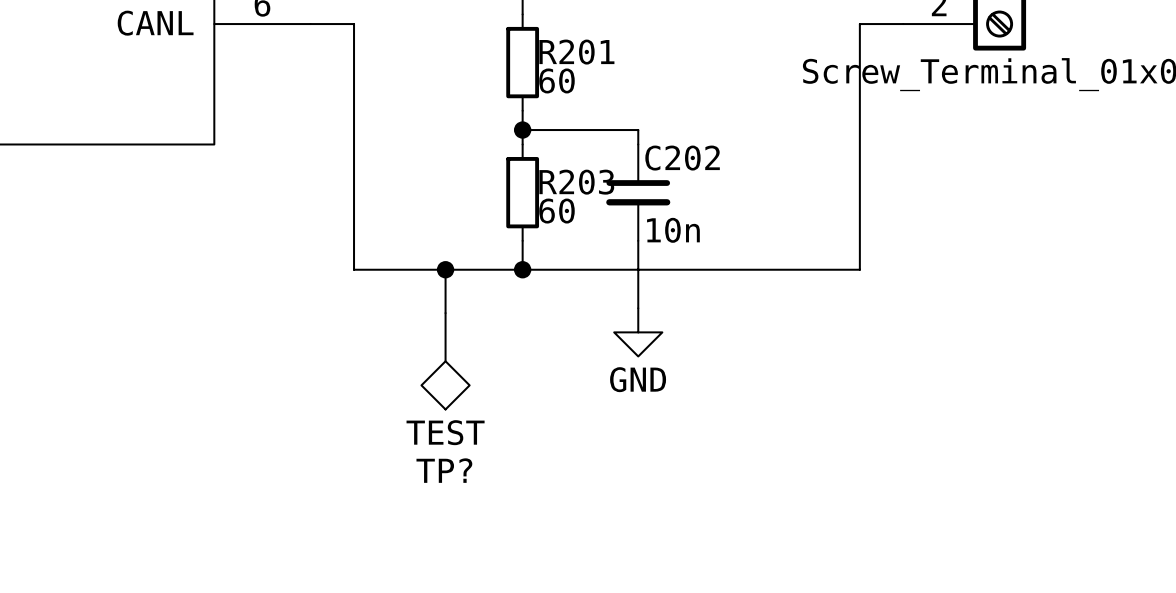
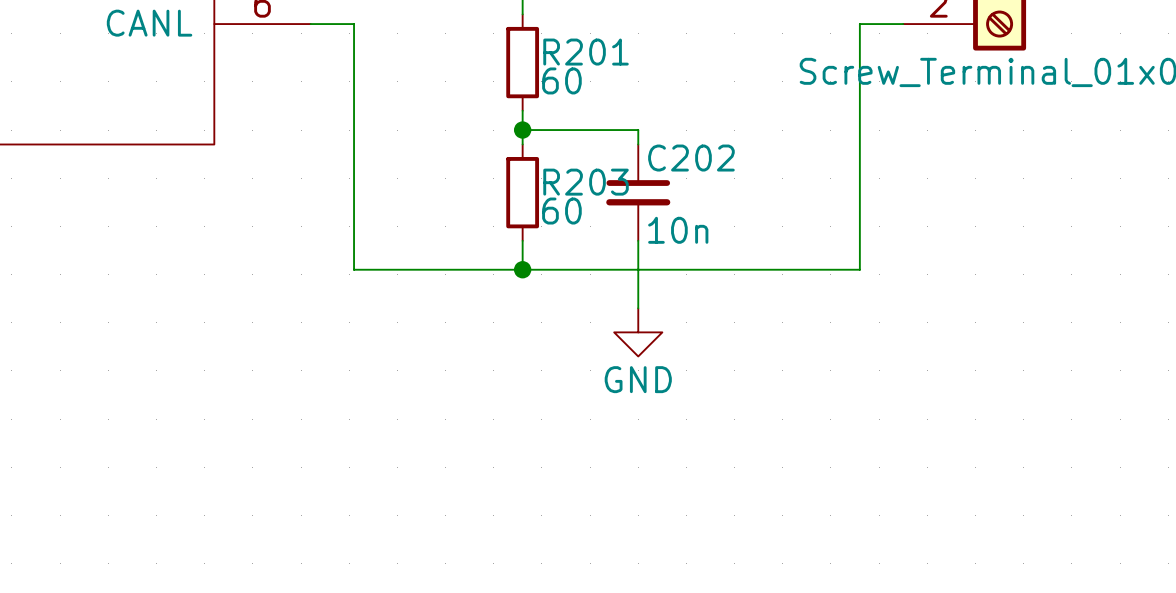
wire: (445, 269) (445, 313) -> none
junction: (445, 269) -> none
TP?: TEST (445, 361) -> none

